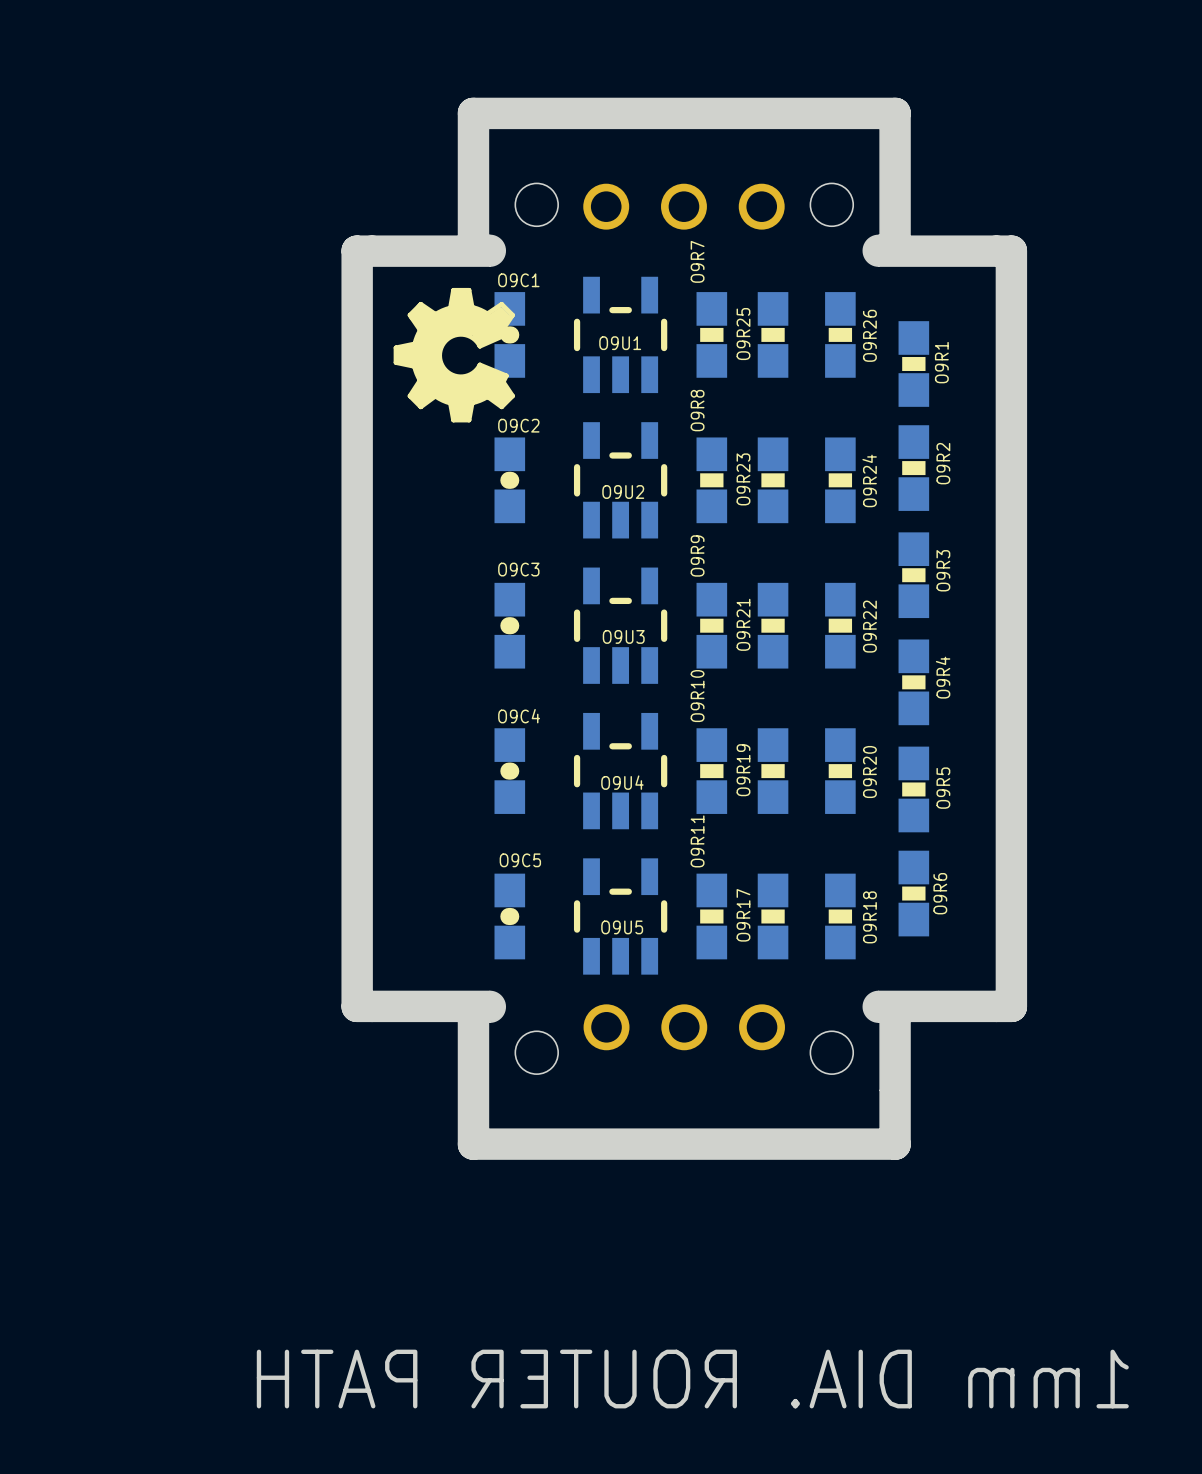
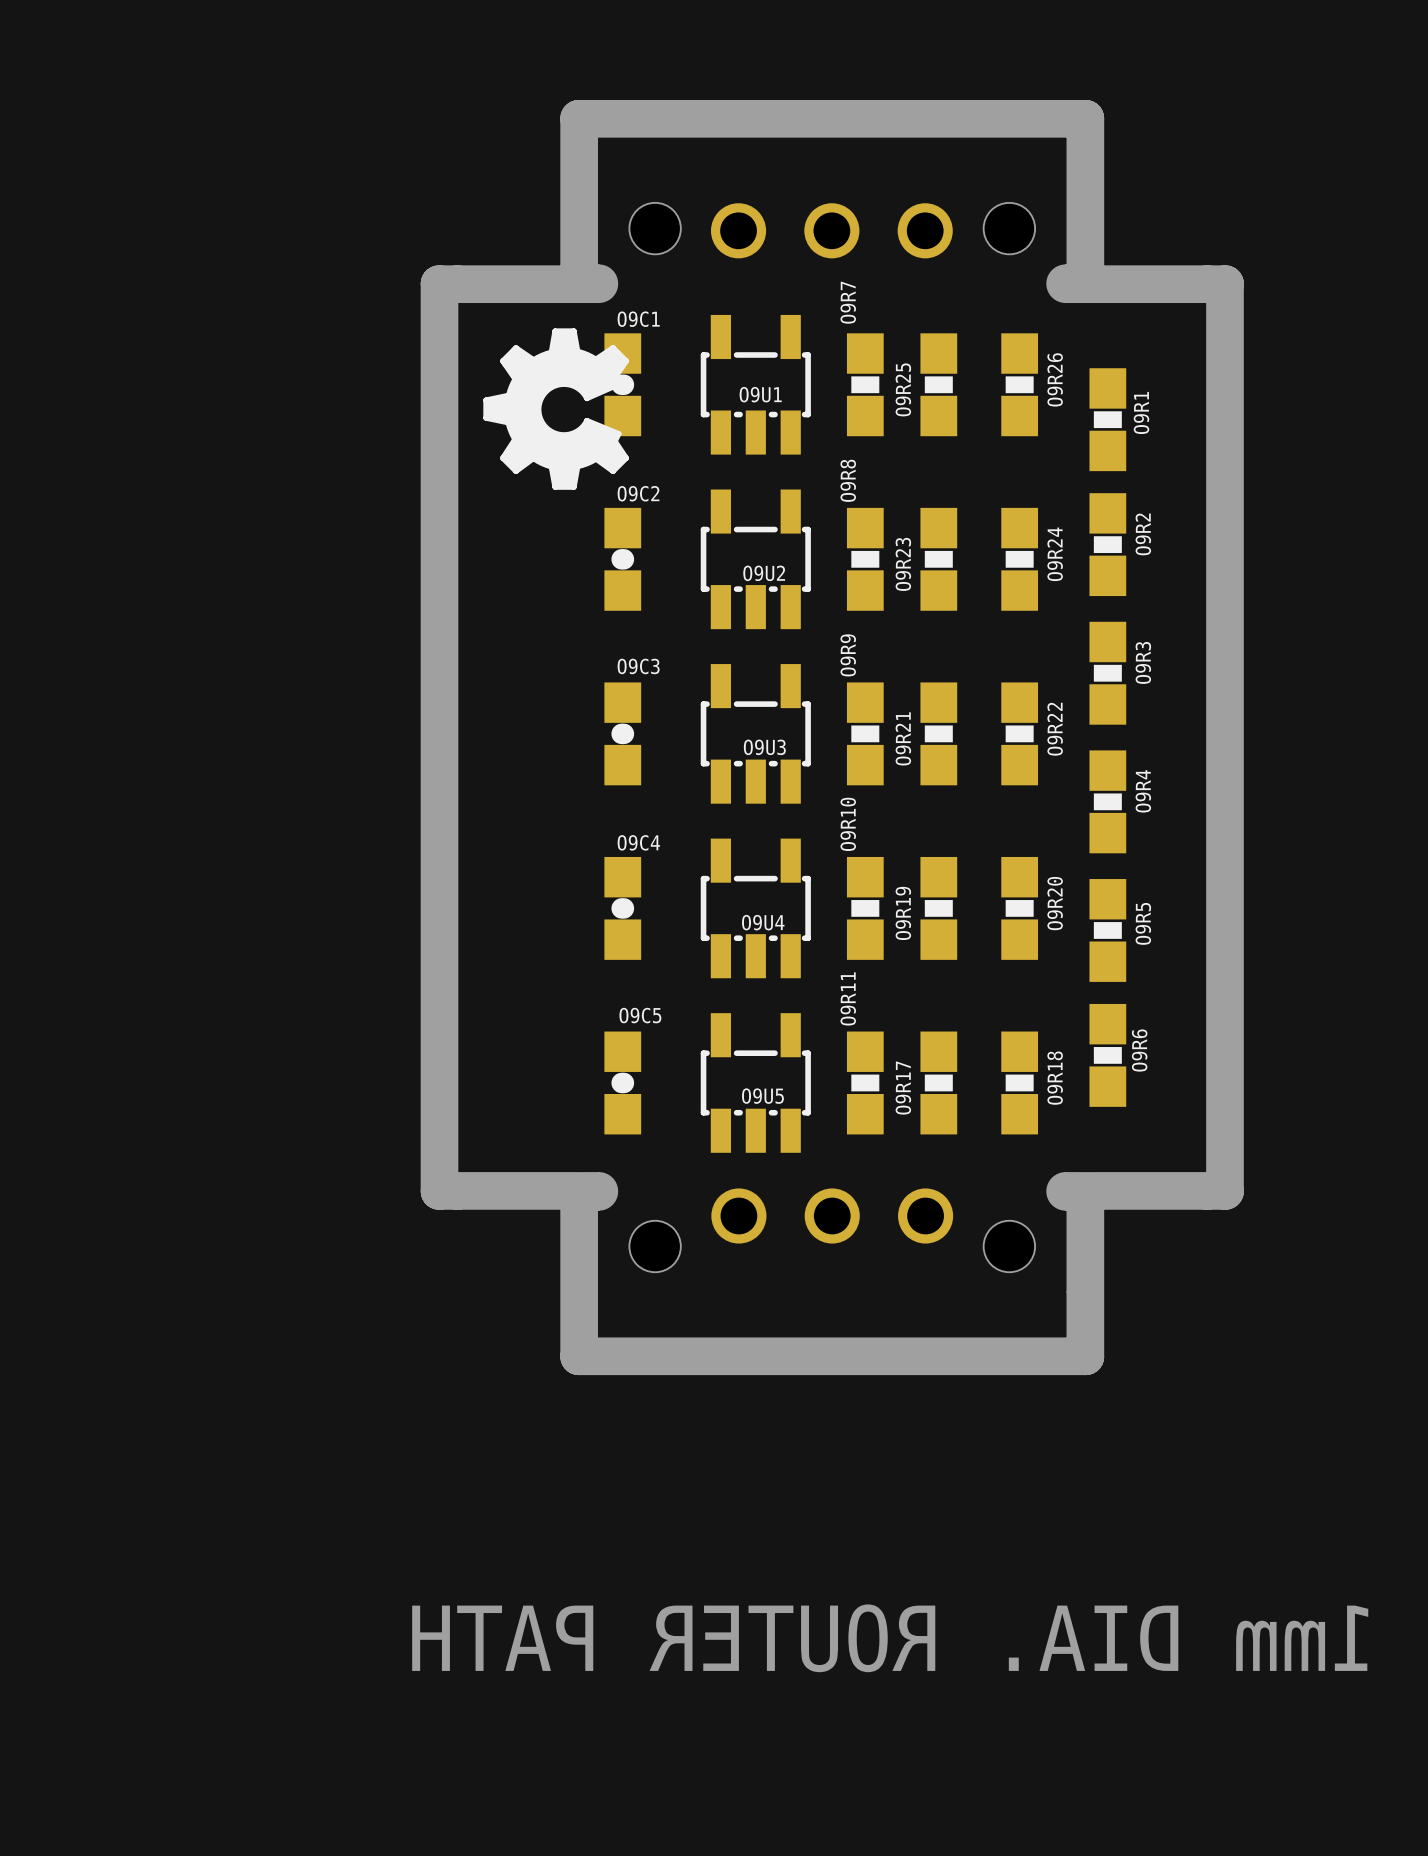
O9U1 footprint: [573, 276, 668, 394] -> [700, 314, 811, 455]
O9U2 footprint: [573, 422, 668, 539] -> [700, 489, 811, 630]
O9U3 footprint: [573, 567, 668, 684] -> [700, 664, 811, 804]
O9U4 footprint: [573, 712, 668, 830] -> [700, 838, 811, 979]
O9U5 footprint: [573, 858, 668, 975] -> [700, 1013, 811, 1153]

